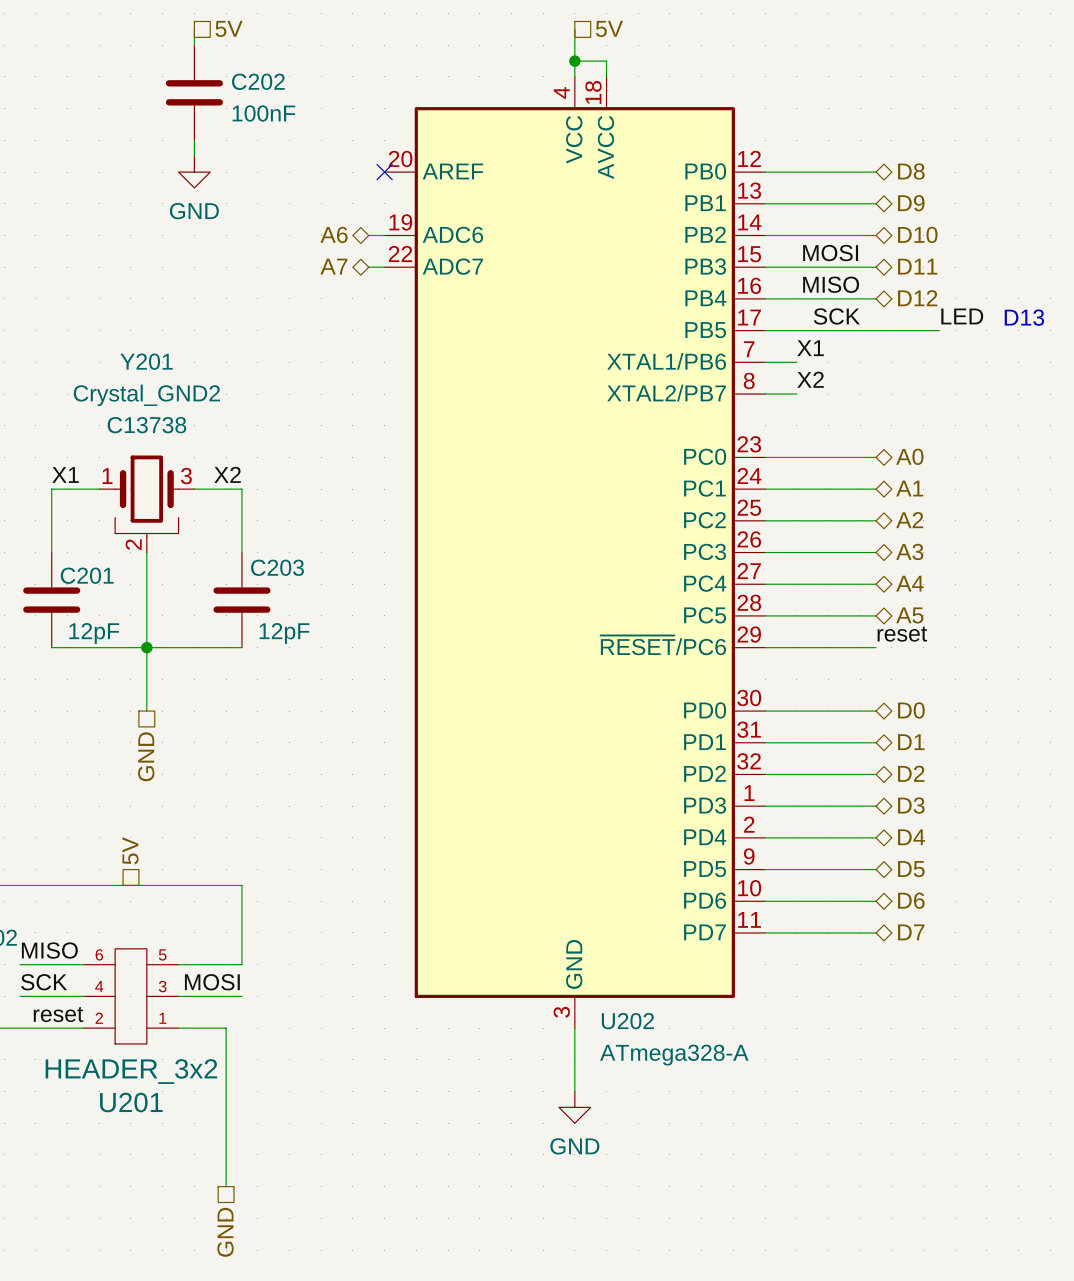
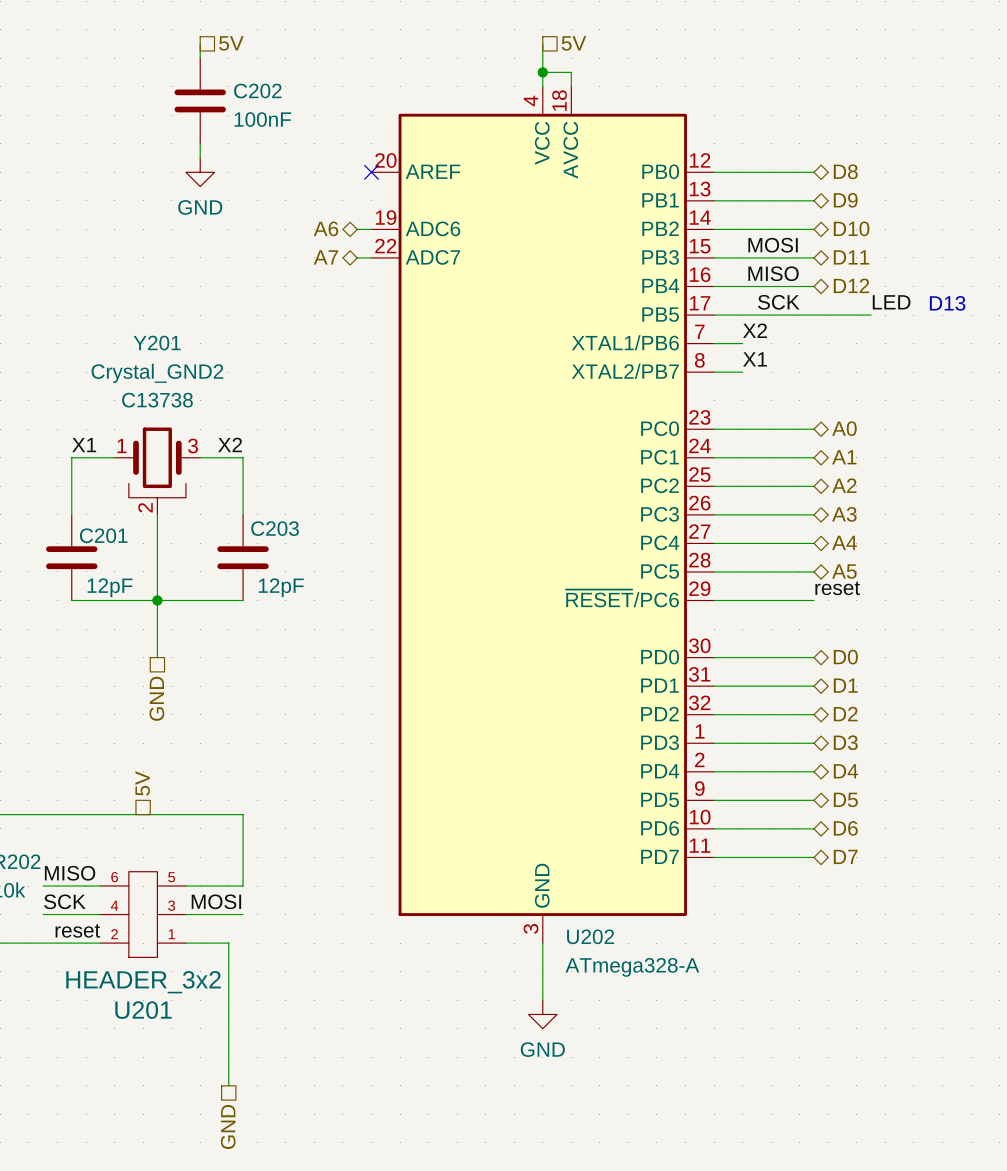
label: X1 (810, 348) -> X2 (755, 330)
label: X2 (810, 379) -> X1 (755, 359)

